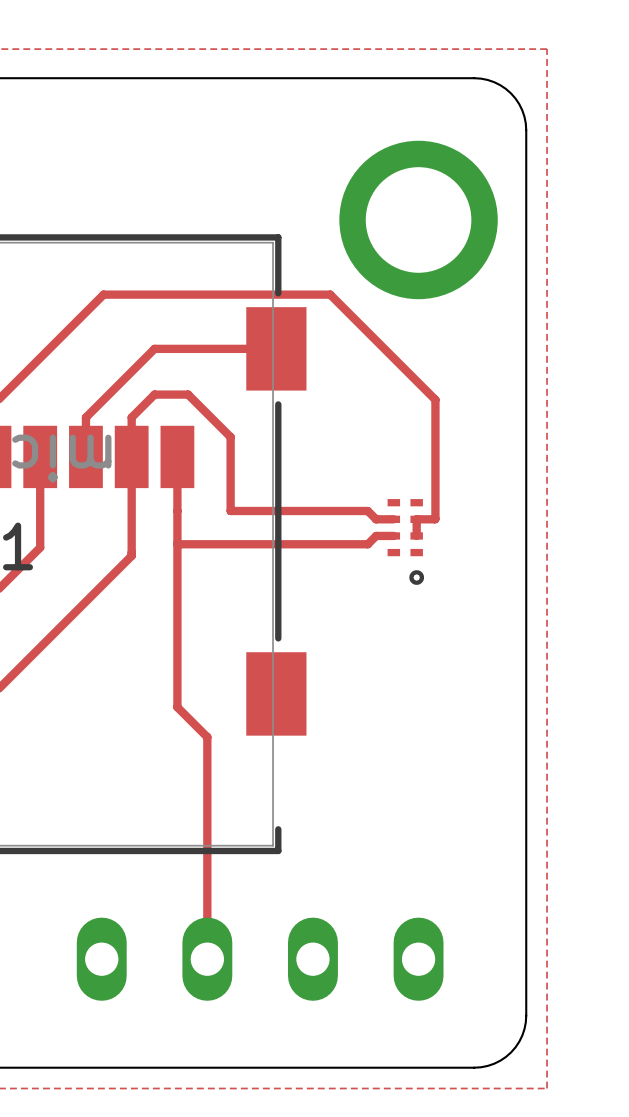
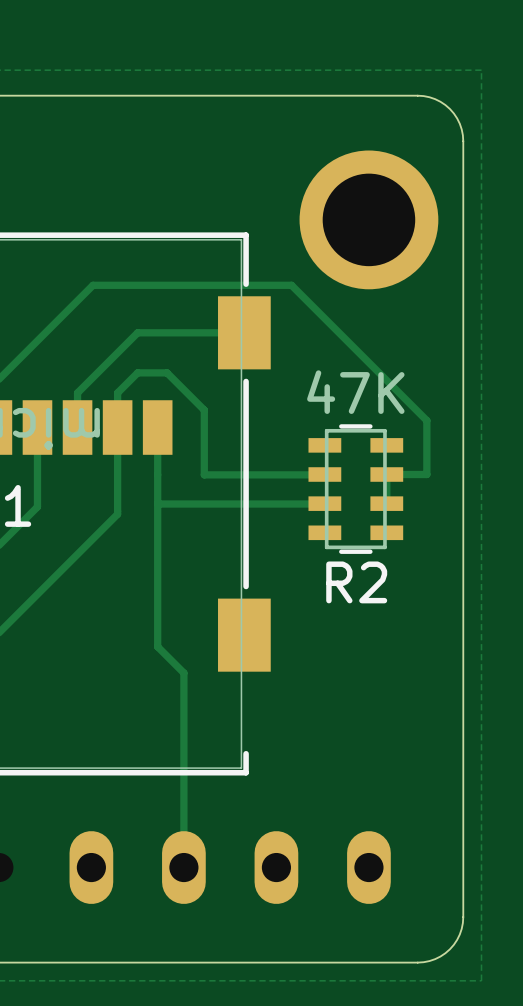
track: (435, 399) (435, 518) -> (383, 377) (426, 420) (426, 474) (386, 474) (386, 503)
track: (367, 511) (376, 519) (393, 519) -> none
track: (434, 519) (416, 519) (416, 535) -> none
R2: none -> 47K (355, 489)
track: (393, 535) (376, 535) (367, 544) -> none
part: (405, 541) -> none

